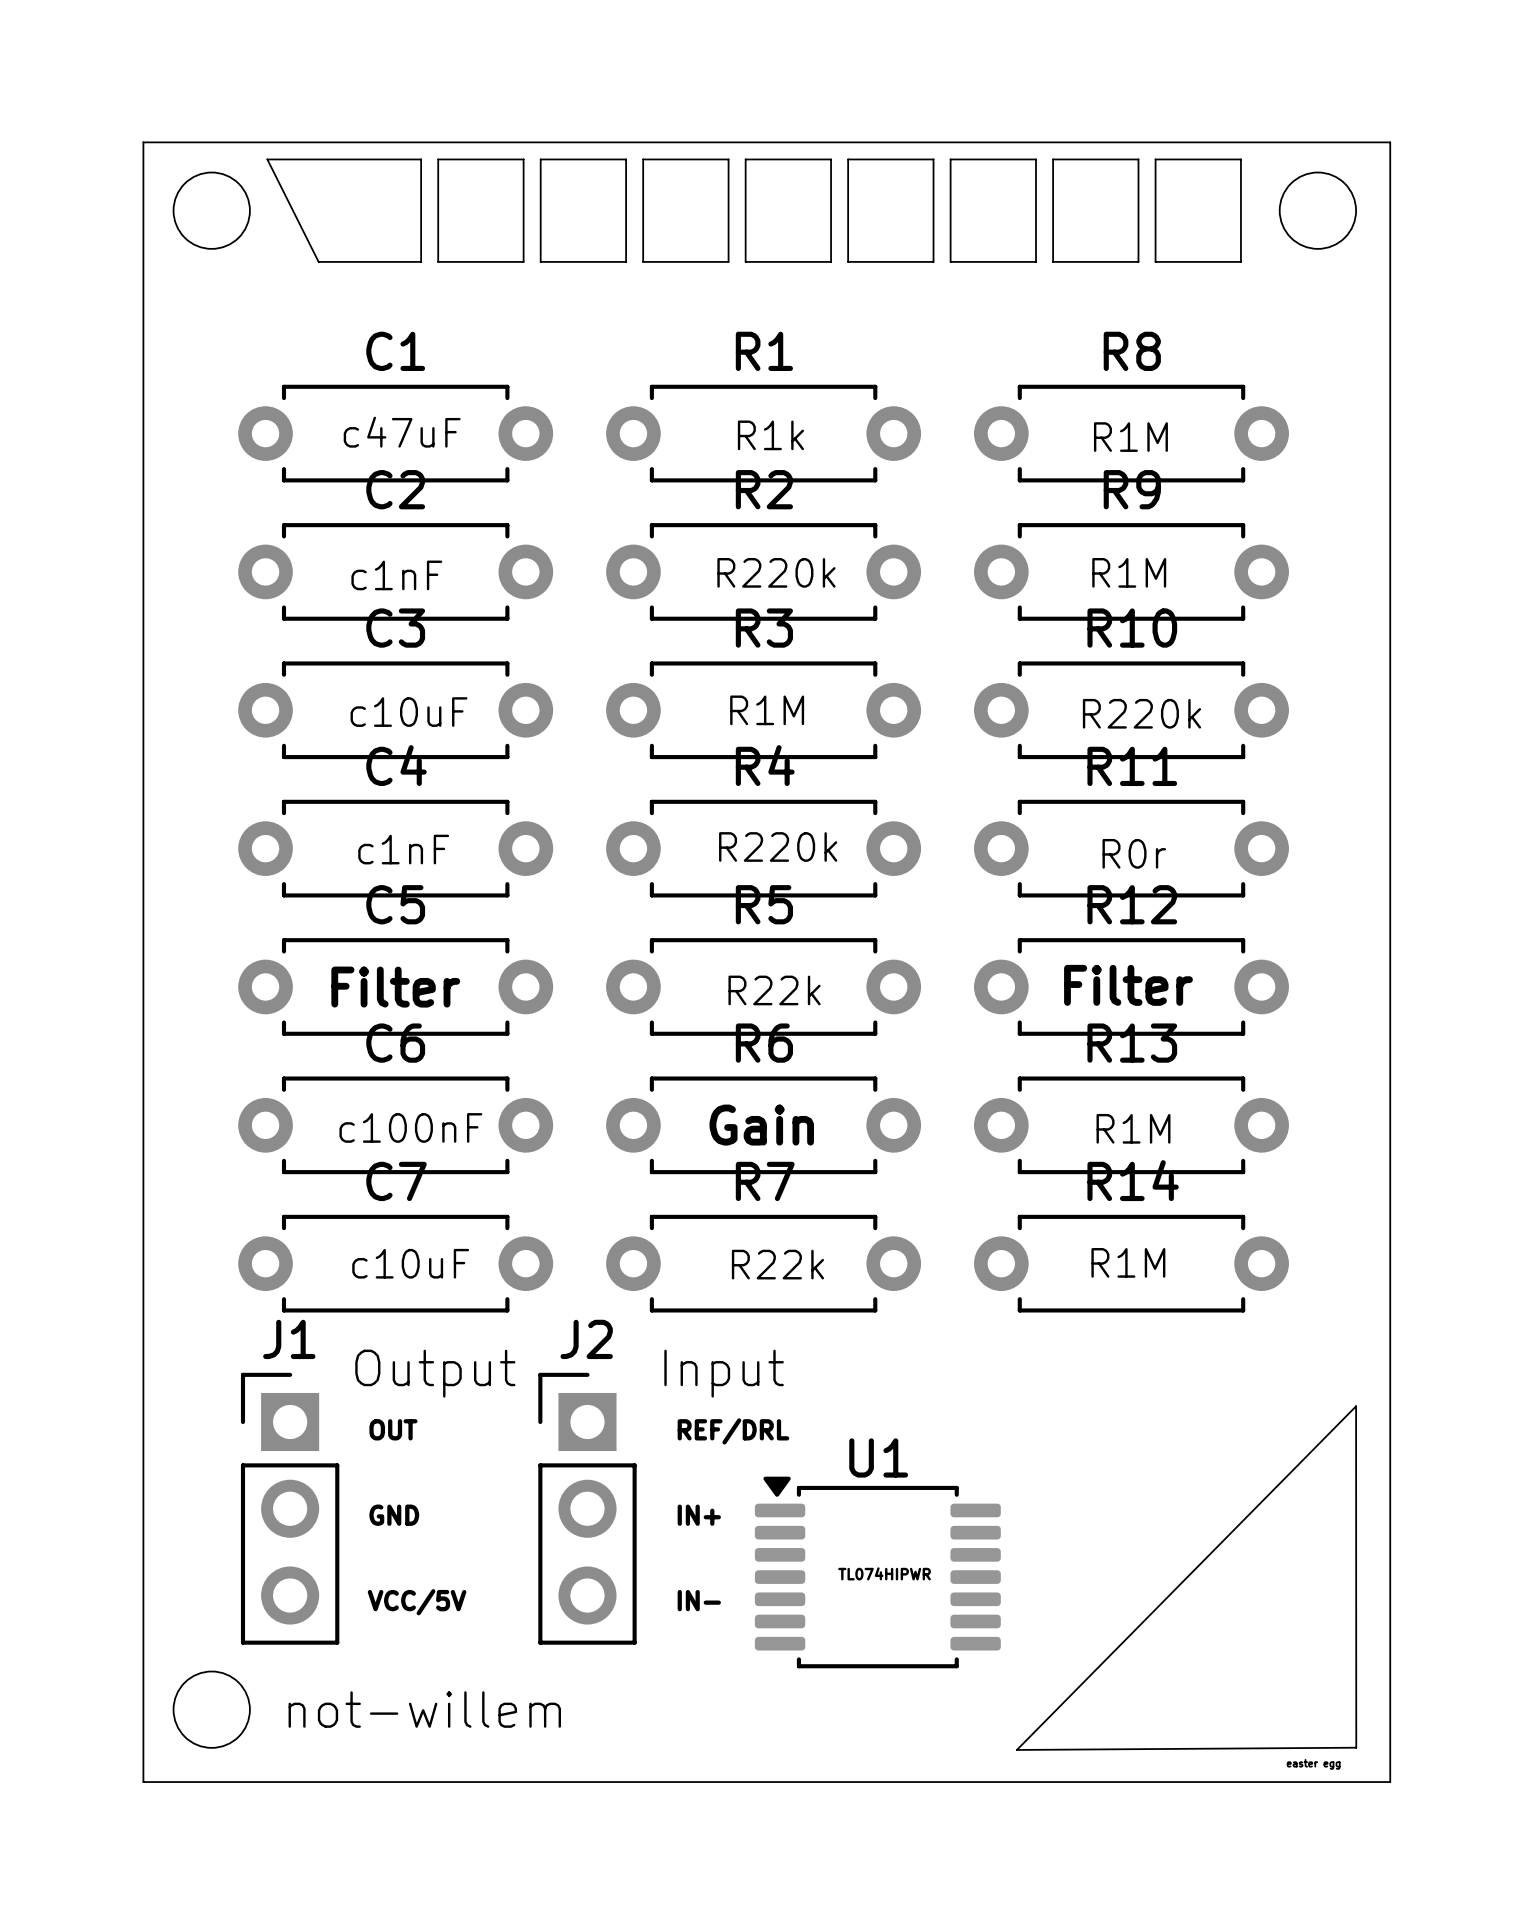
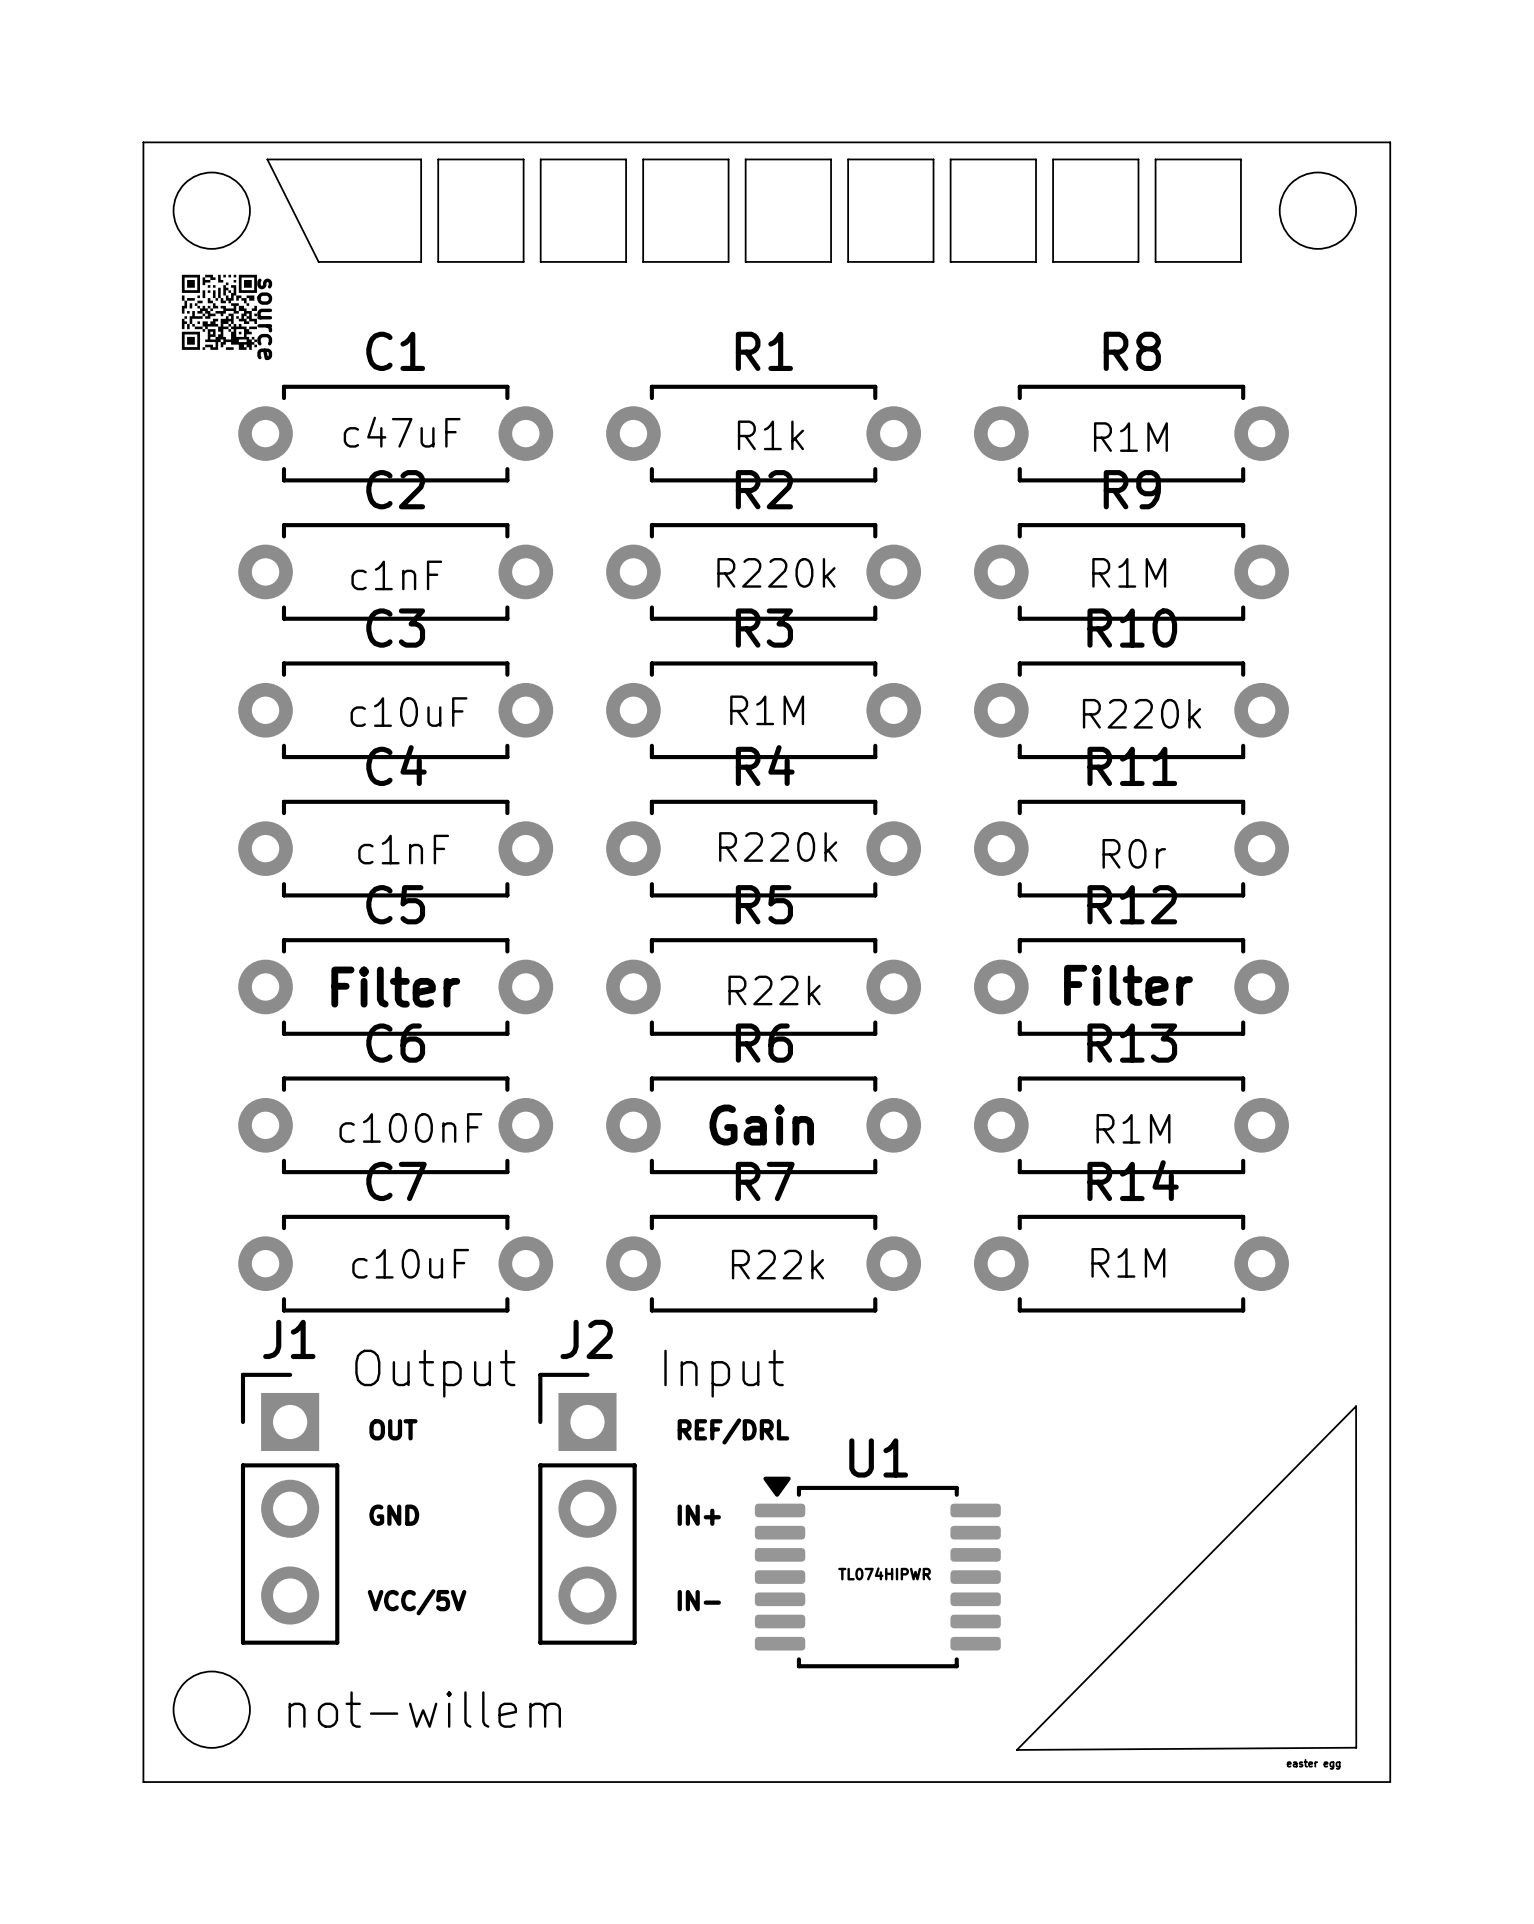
drawing: none -> [181, 274, 257, 350]
text: none -> source (264, 319)

